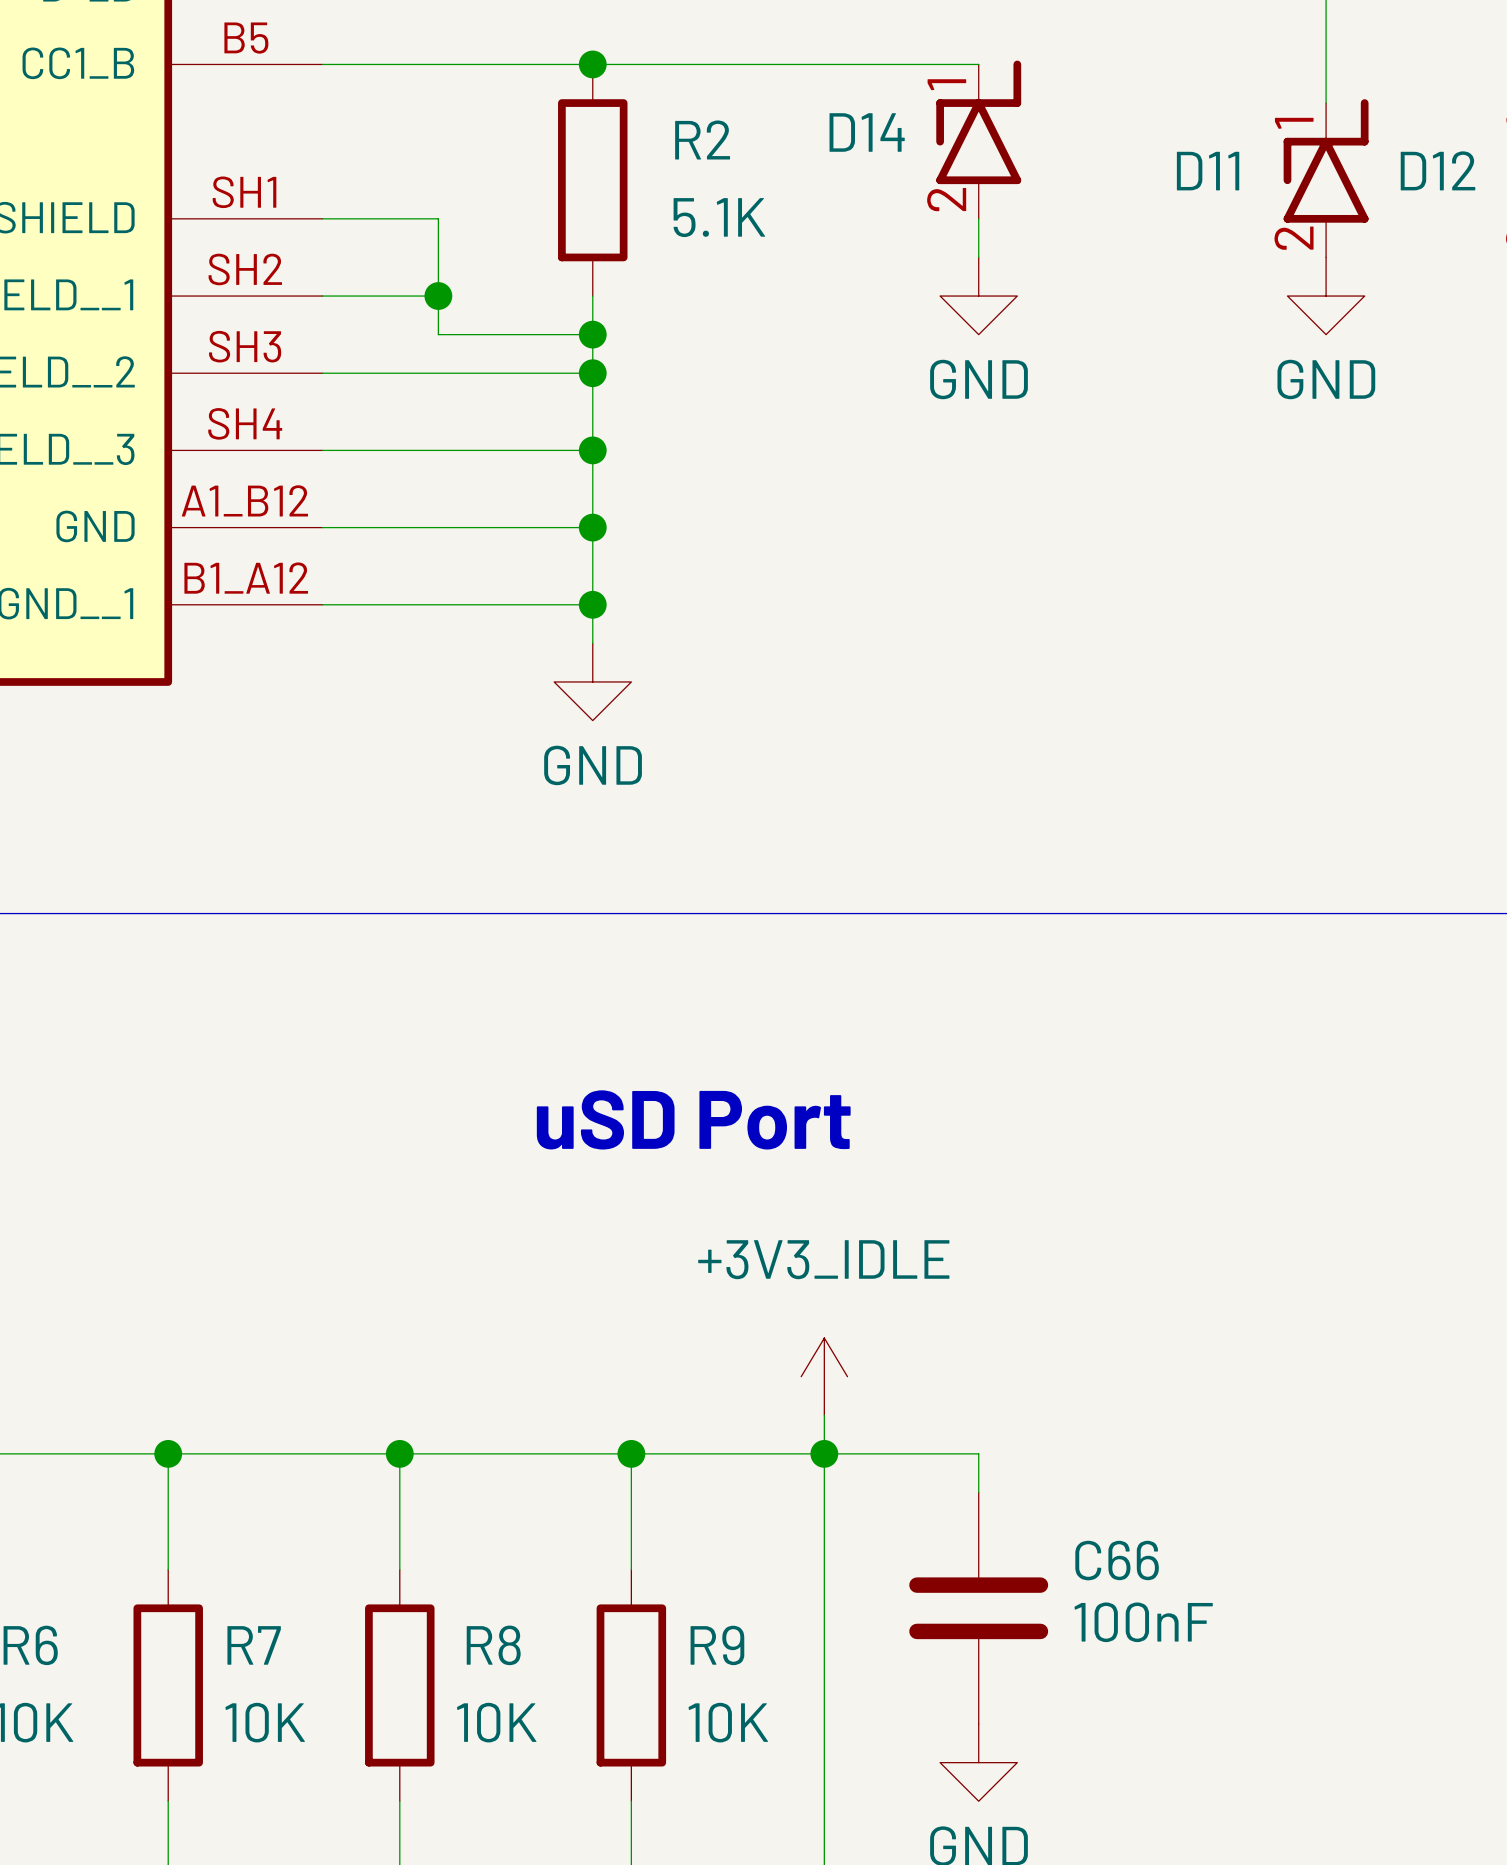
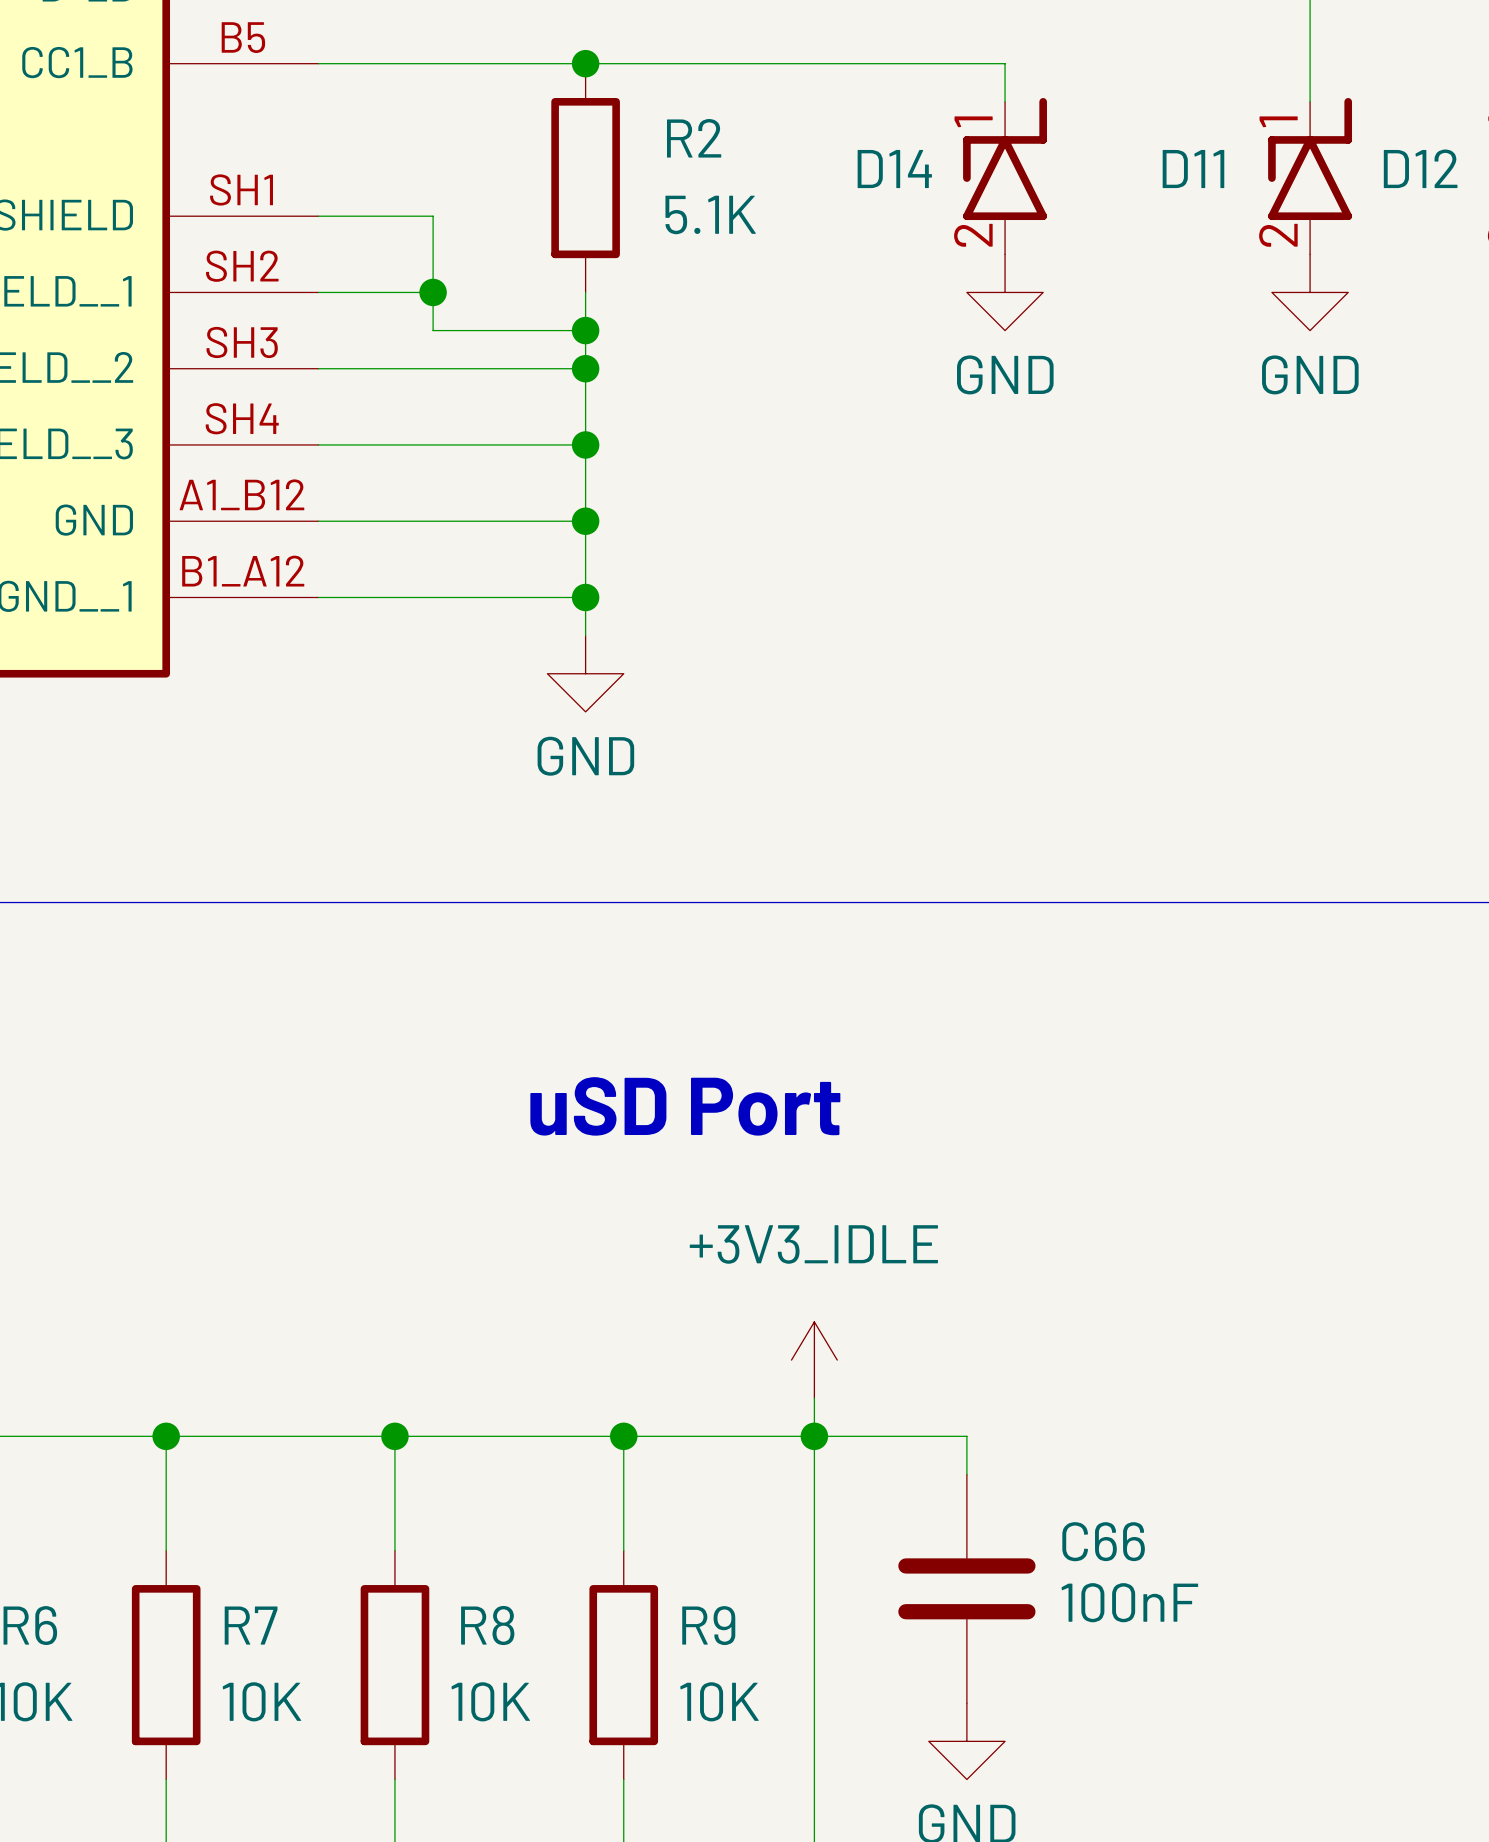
wire: none -> (966, 63) (1005, 63) (1005, 101)
D14 position: (978, 139) -> (1005, 176)
wire: (978, 218) (978, 257) -> none
power symbol position: GND (978, 296) -> GND (1005, 292)

